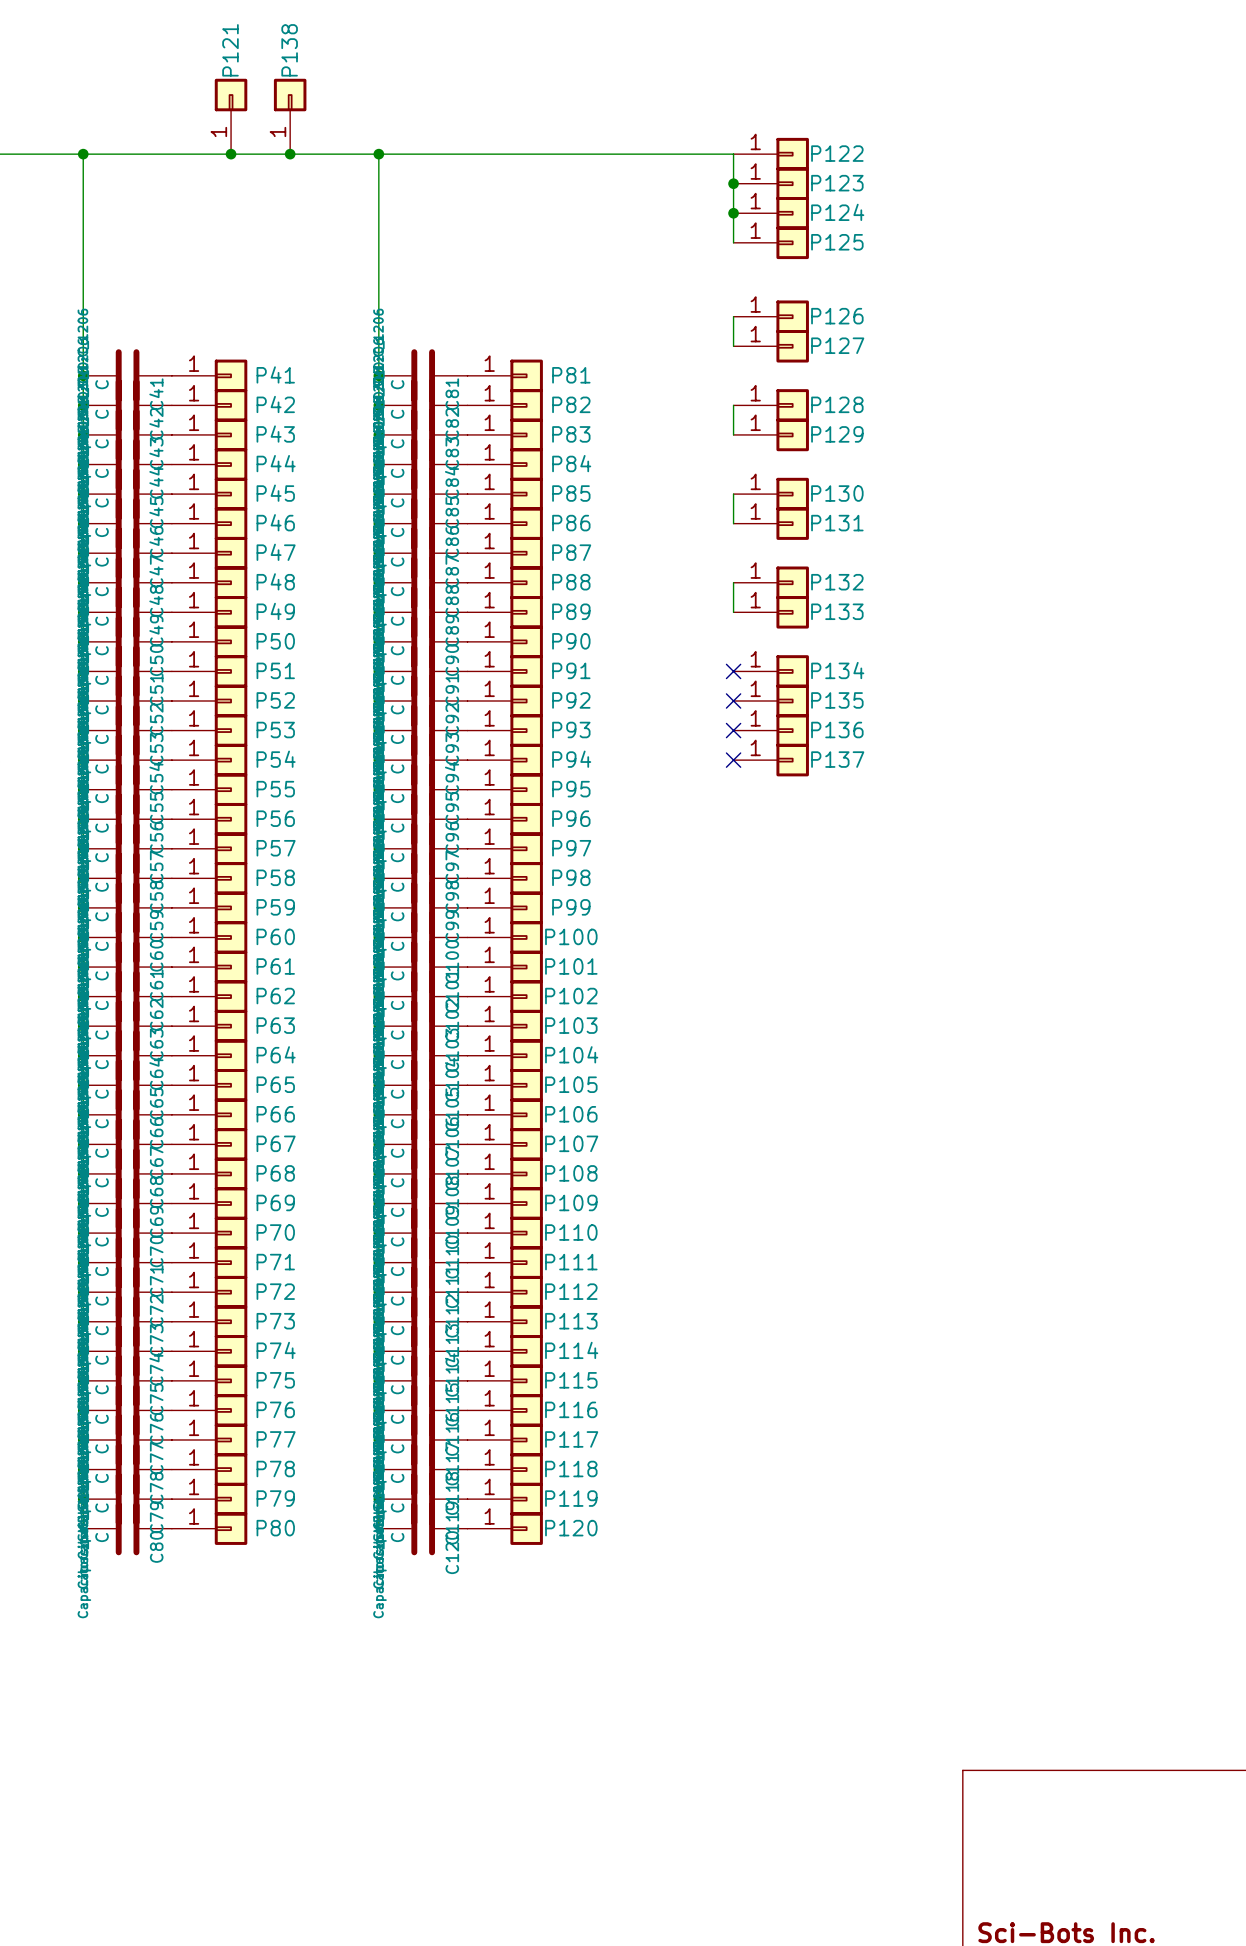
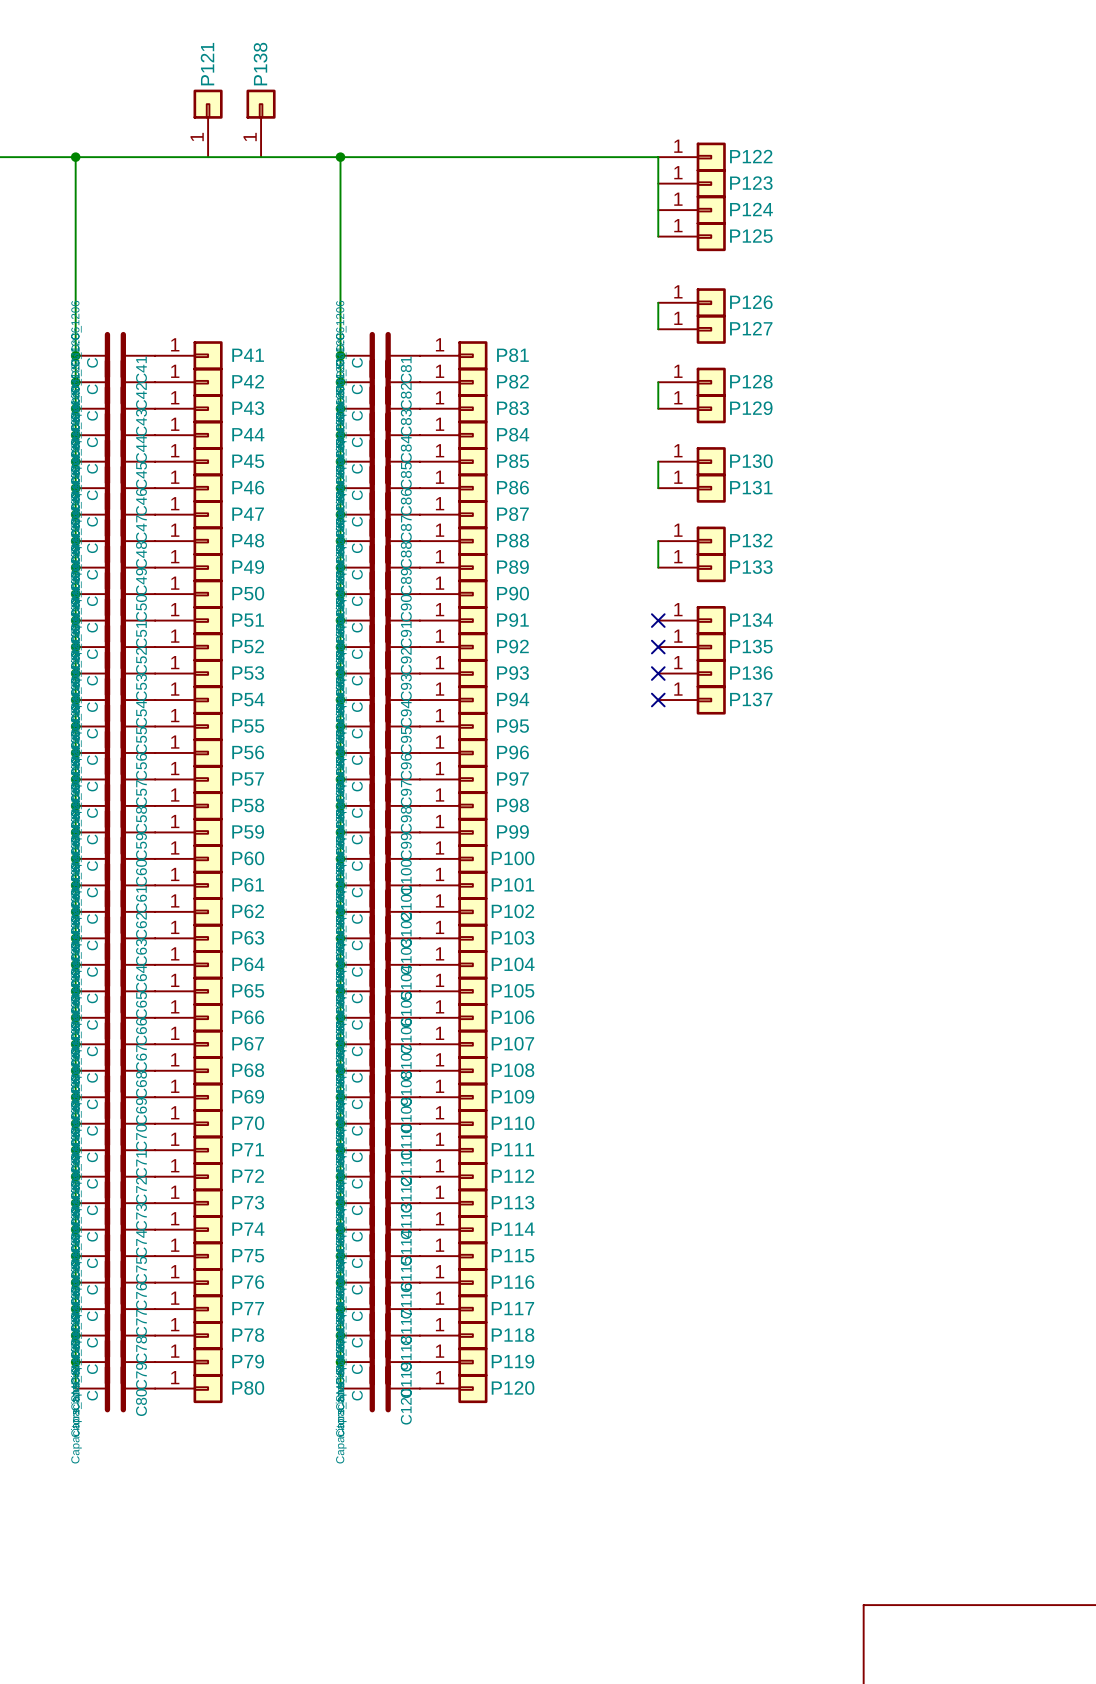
junction: (231, 154) -> none
junction: (290, 154) -> none
junction: (733, 183) -> none
junction: (733, 213) -> none

